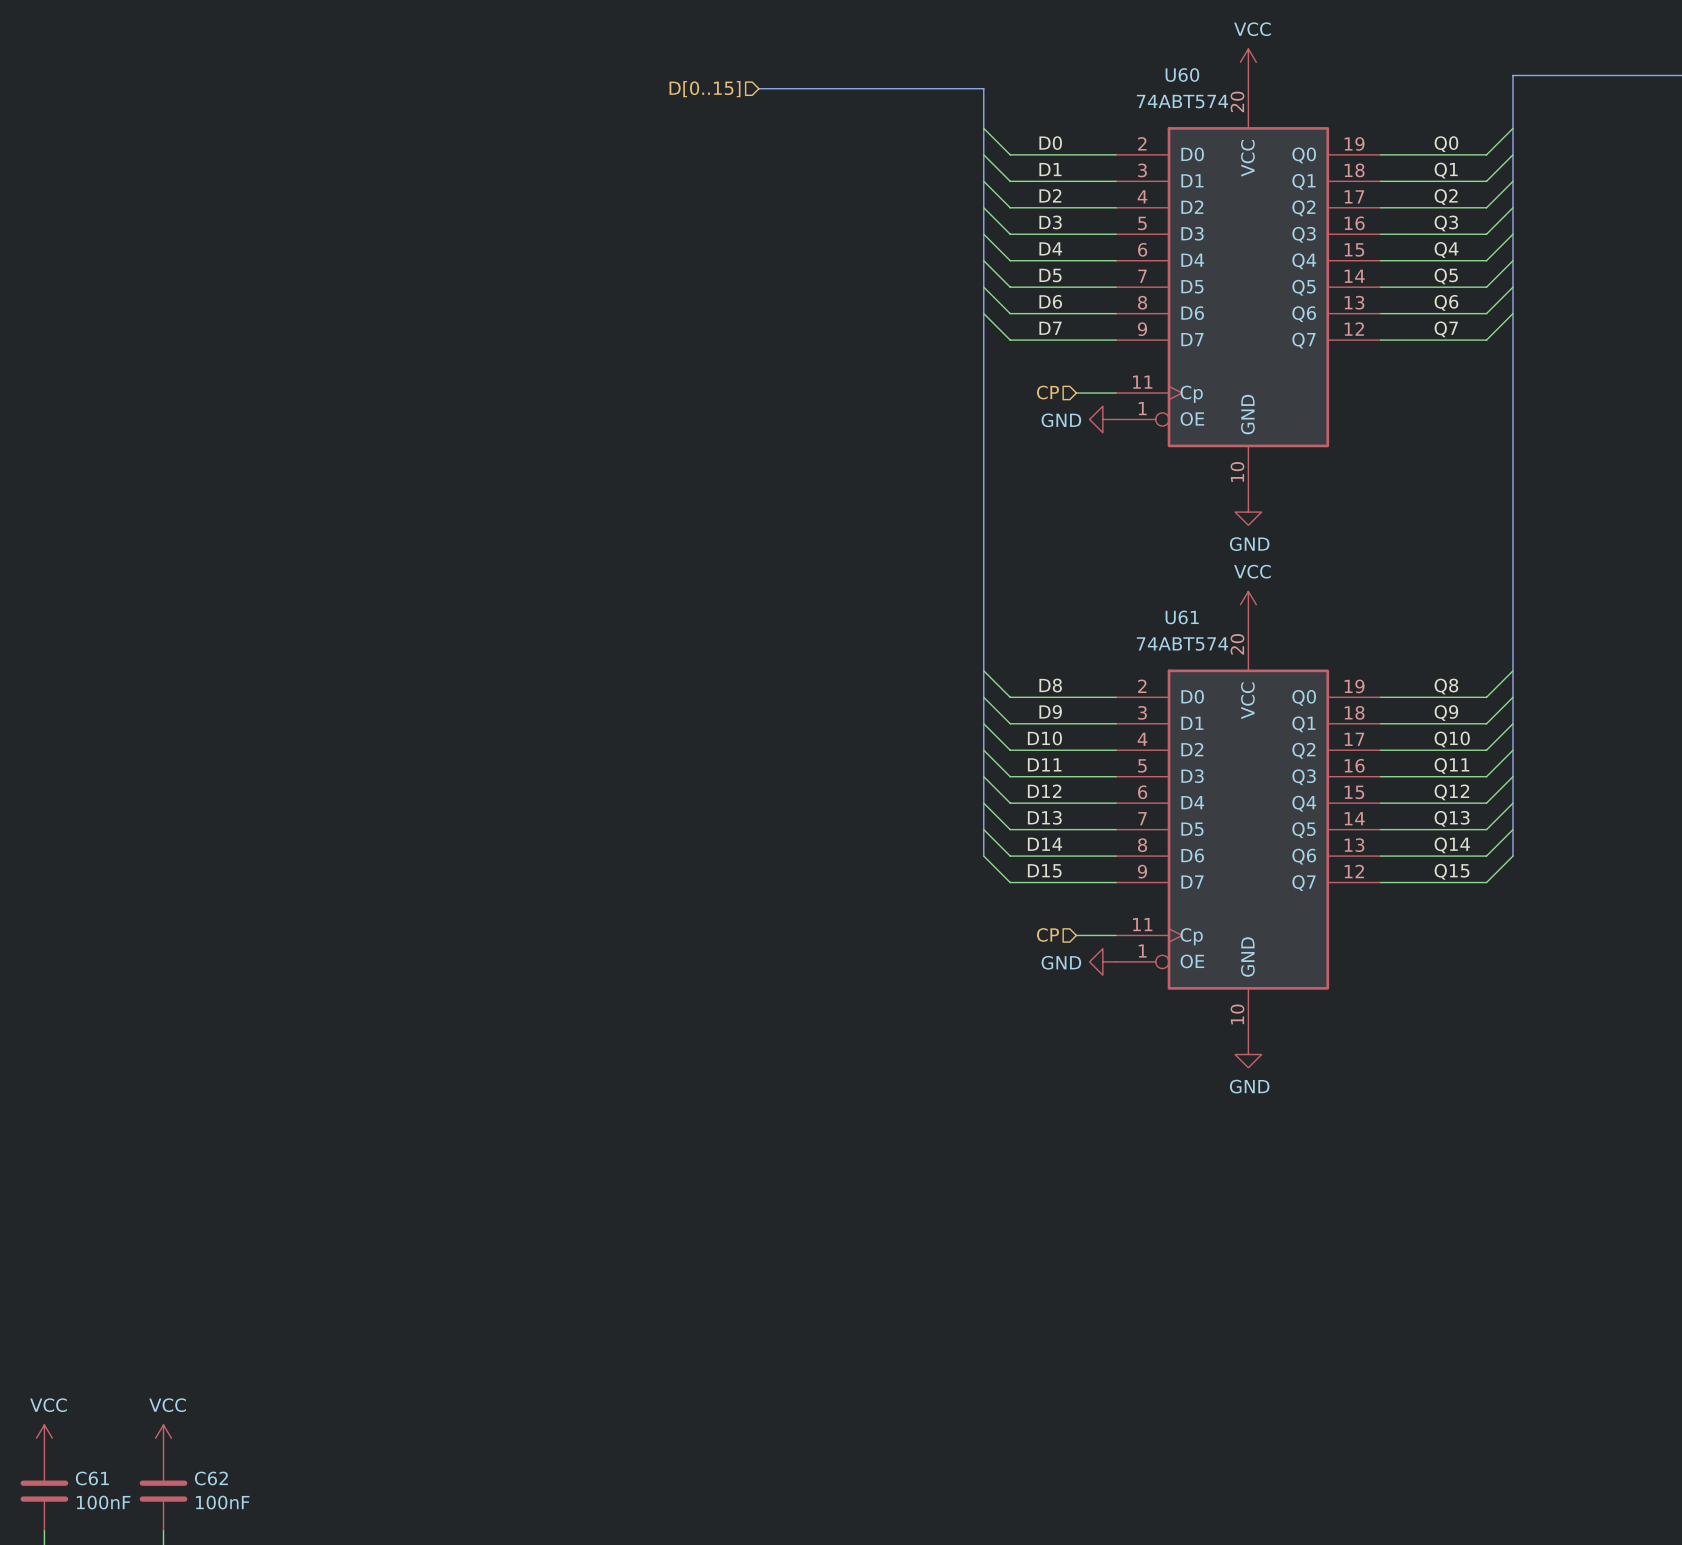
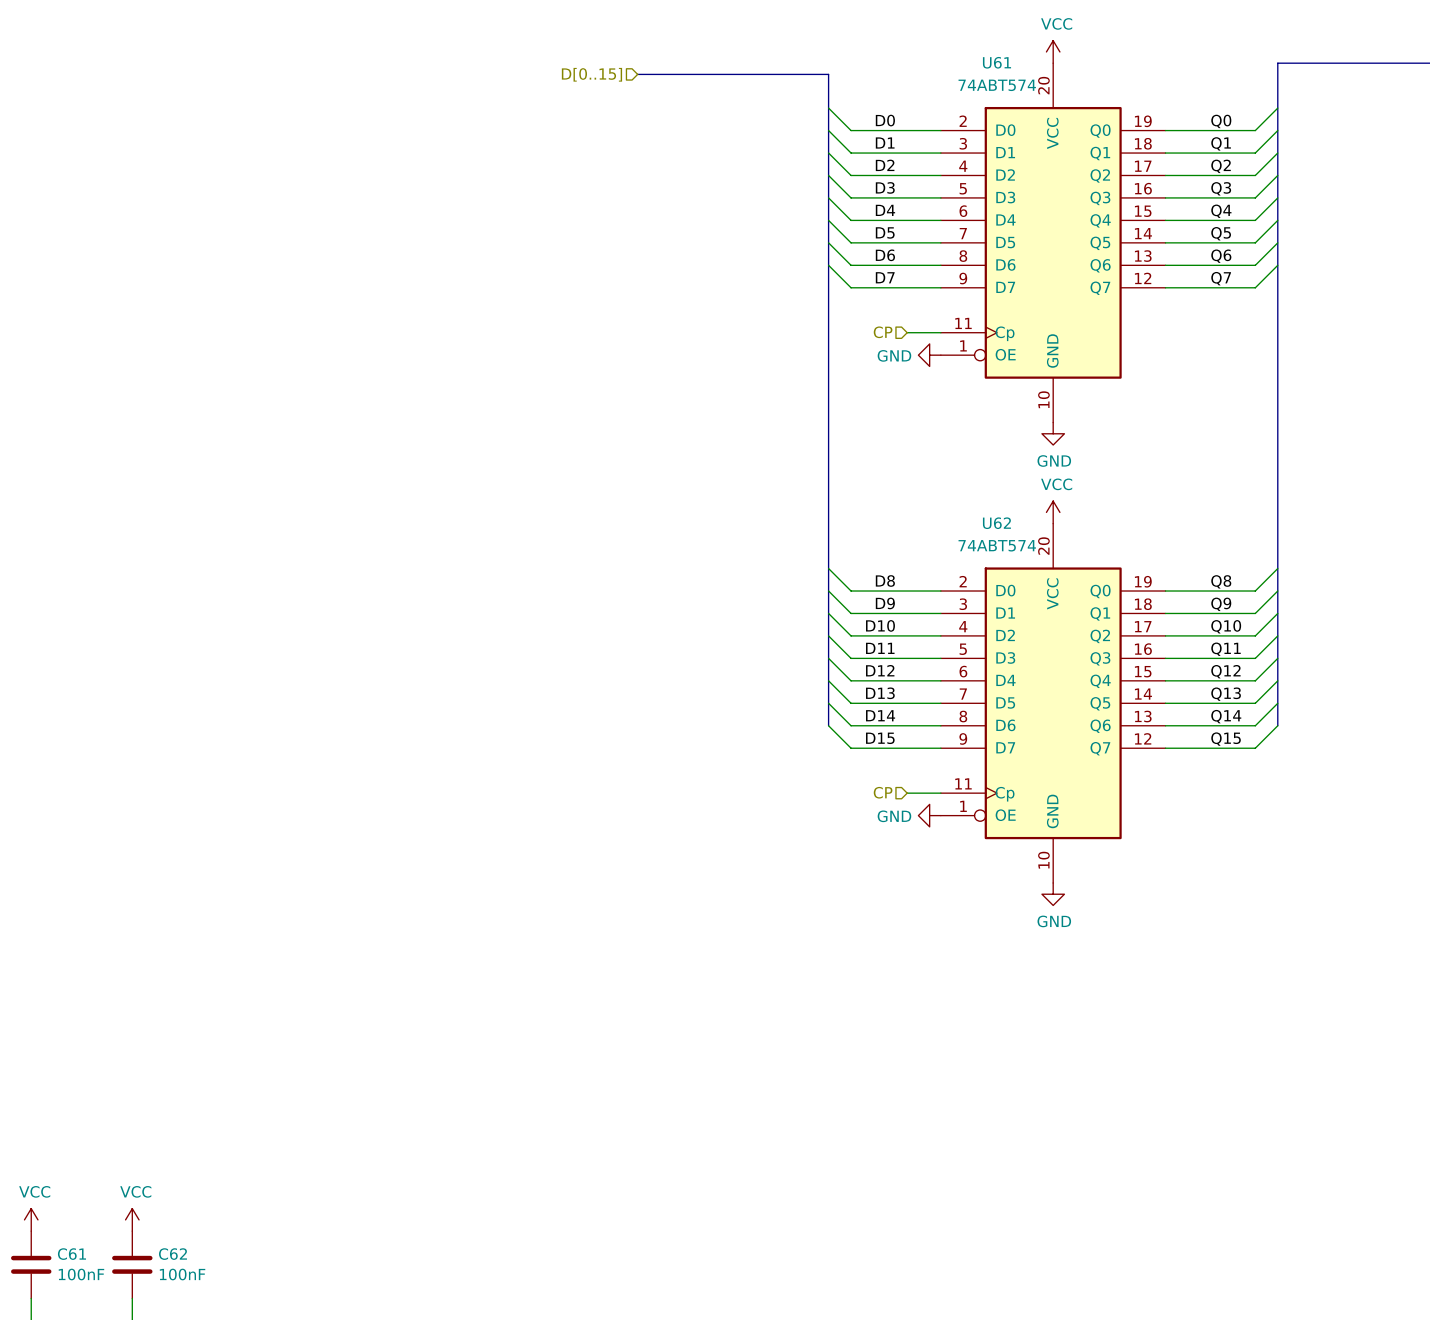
U60 name: U60 (1182, 75) -> U61 (997, 62)
U61 name: U61 (1182, 617) -> U62 (996, 523)

